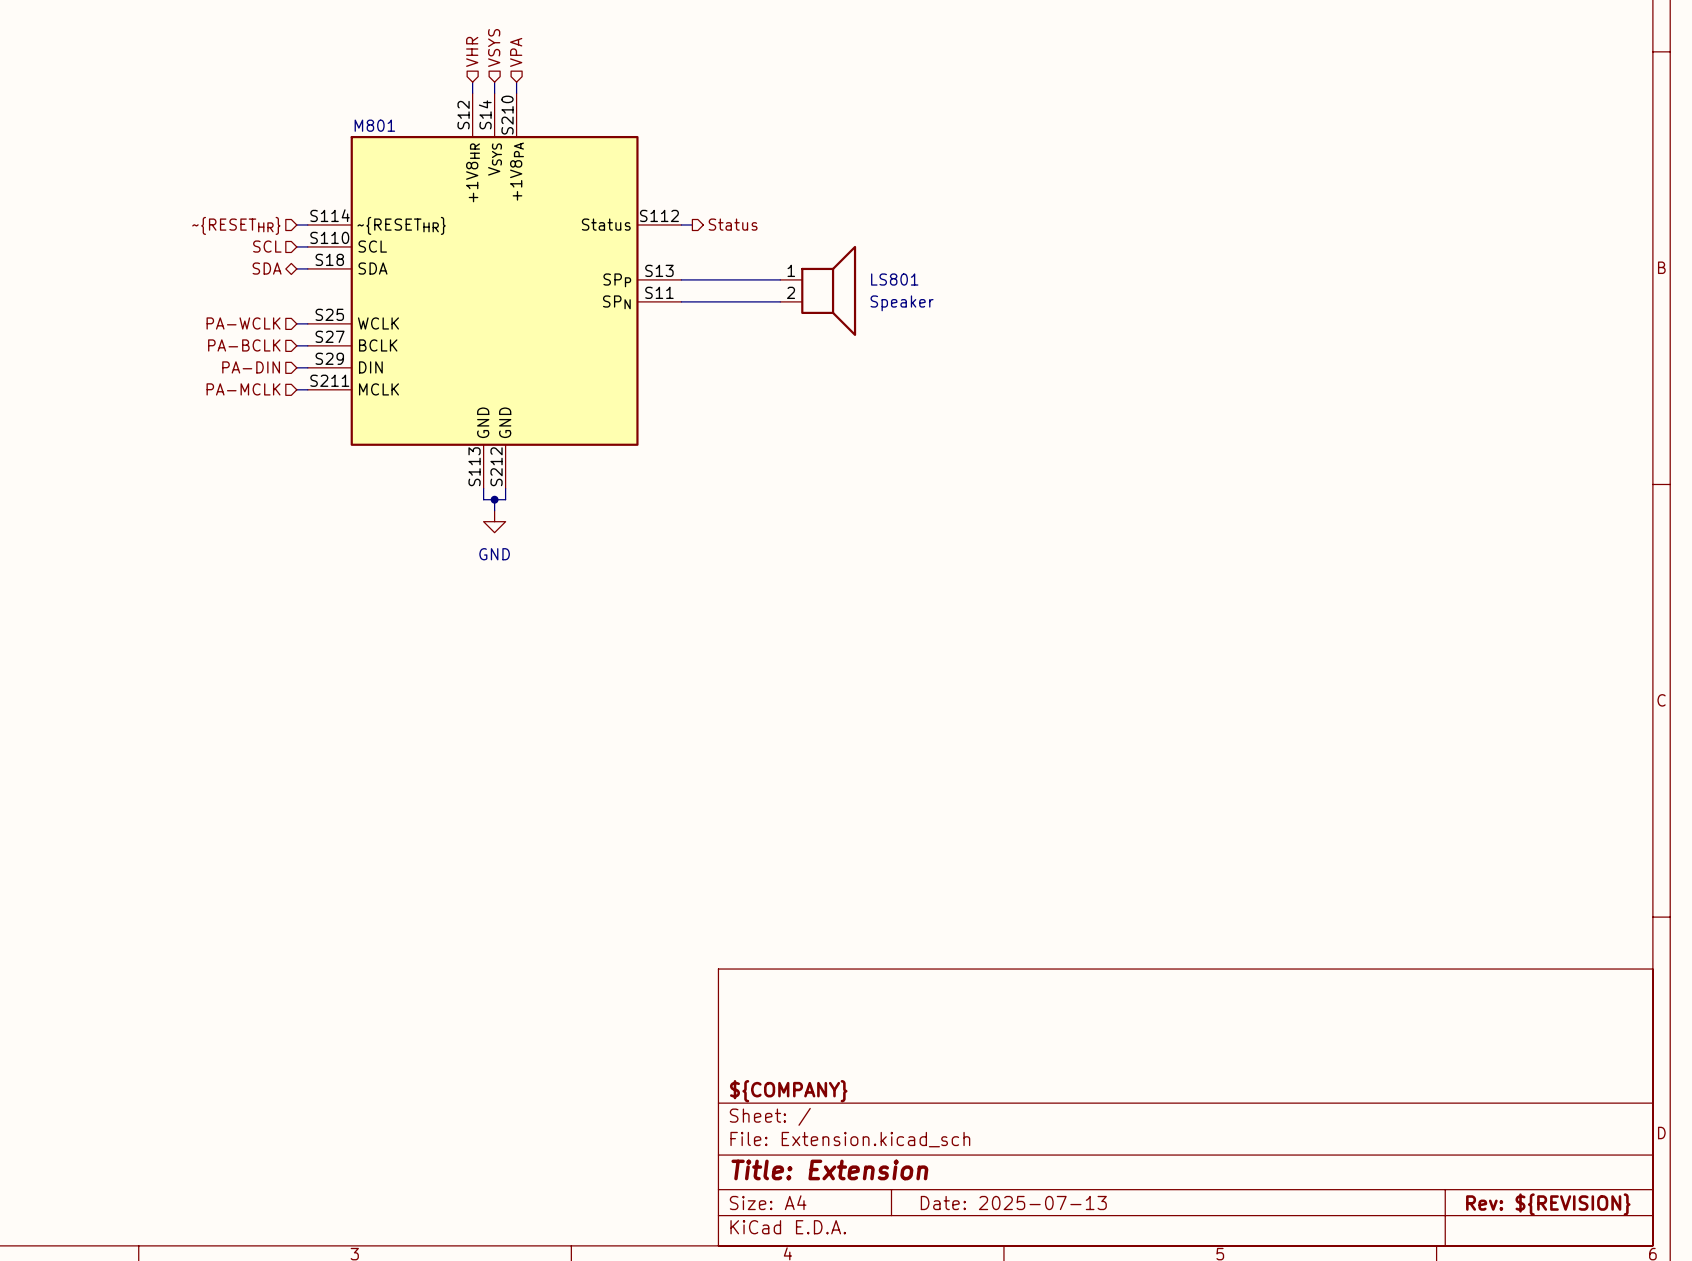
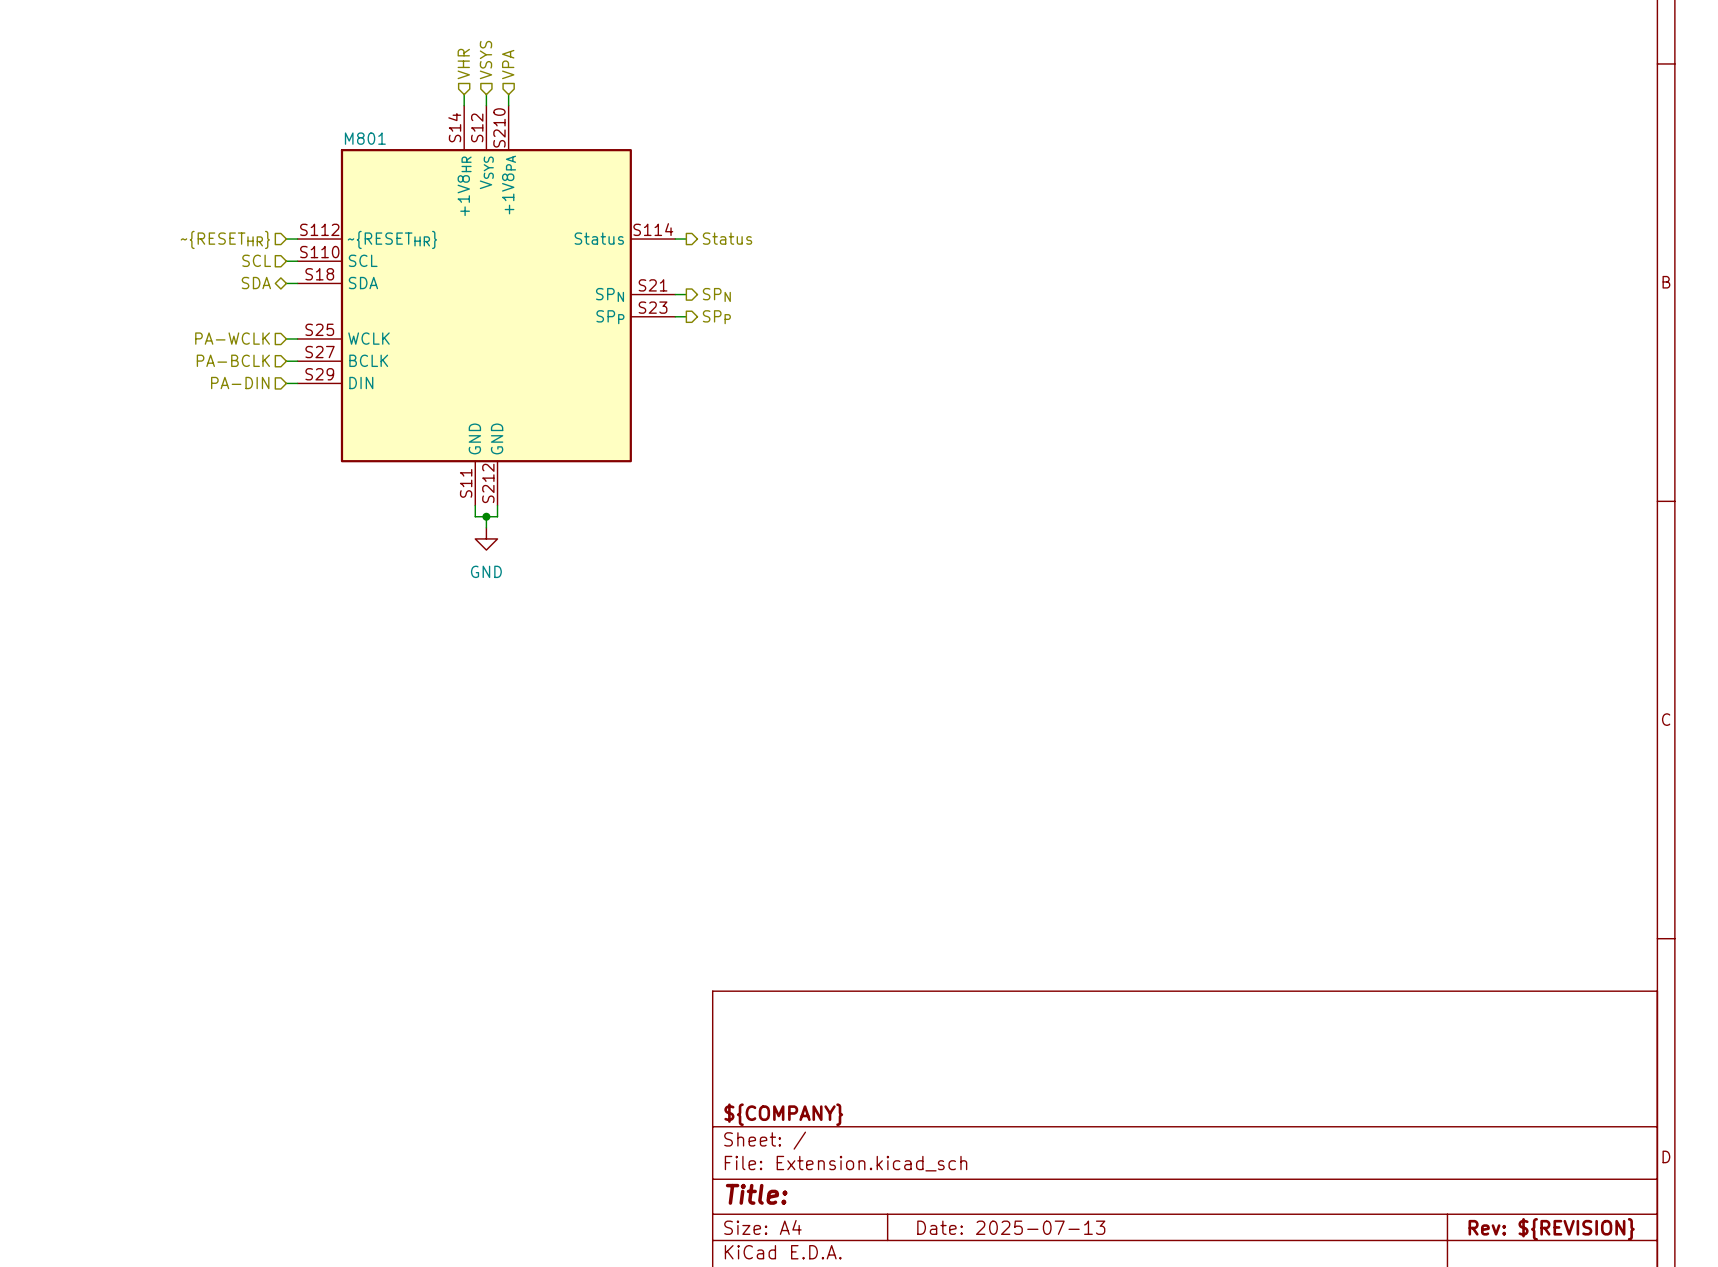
M801 symbol: [307, 93, 682, 489] -> [297, 105, 676, 506]
wire: (692, 279) (780, 279) -> none
hierarchical label: none -> SPN (716, 294)
LS801: Speaker (818, 290) -> none
wire: (692, 301) (780, 301) -> none
hierarchical label: none -> SPP (716, 317)
hierarchical label: PA-MCLK (243, 389) -> none
wire: (296, 389) (307, 389) -> none
title block: Title: Extension (829, 1169) -> Title: (756, 1194)

